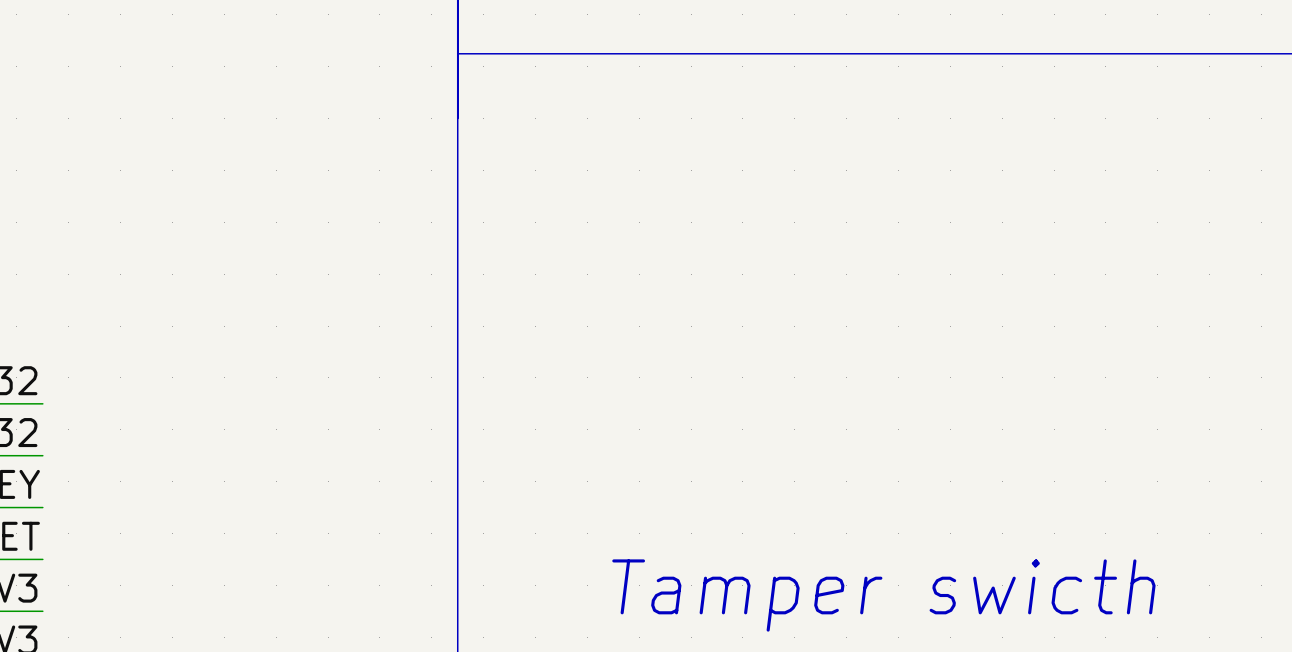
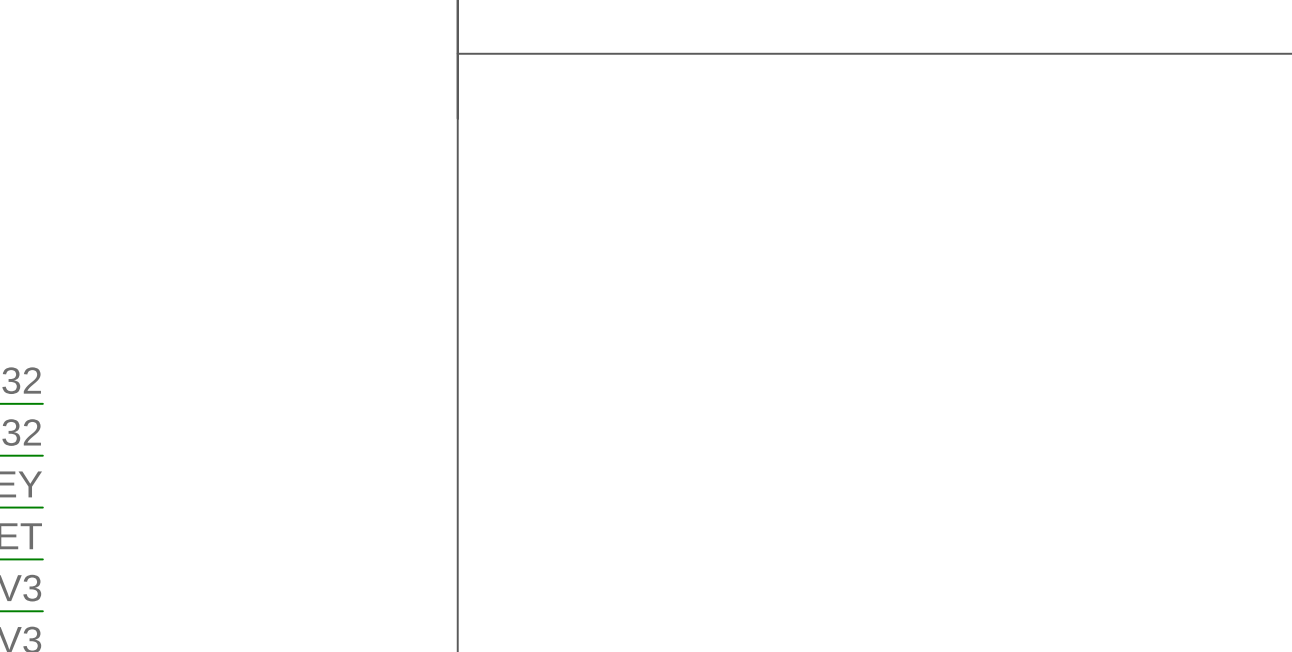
text: Tamper swicth (883, 595) -> none

